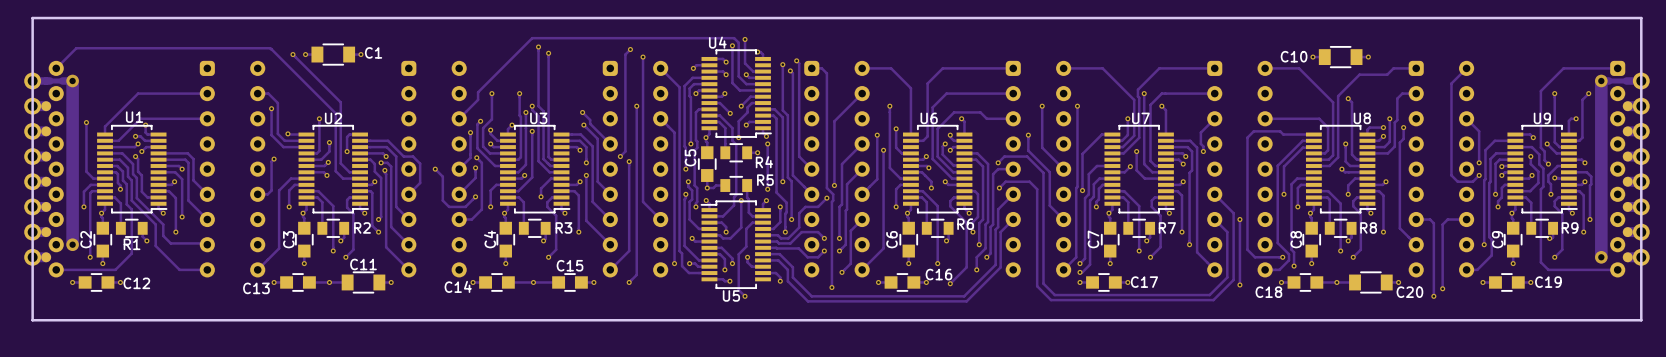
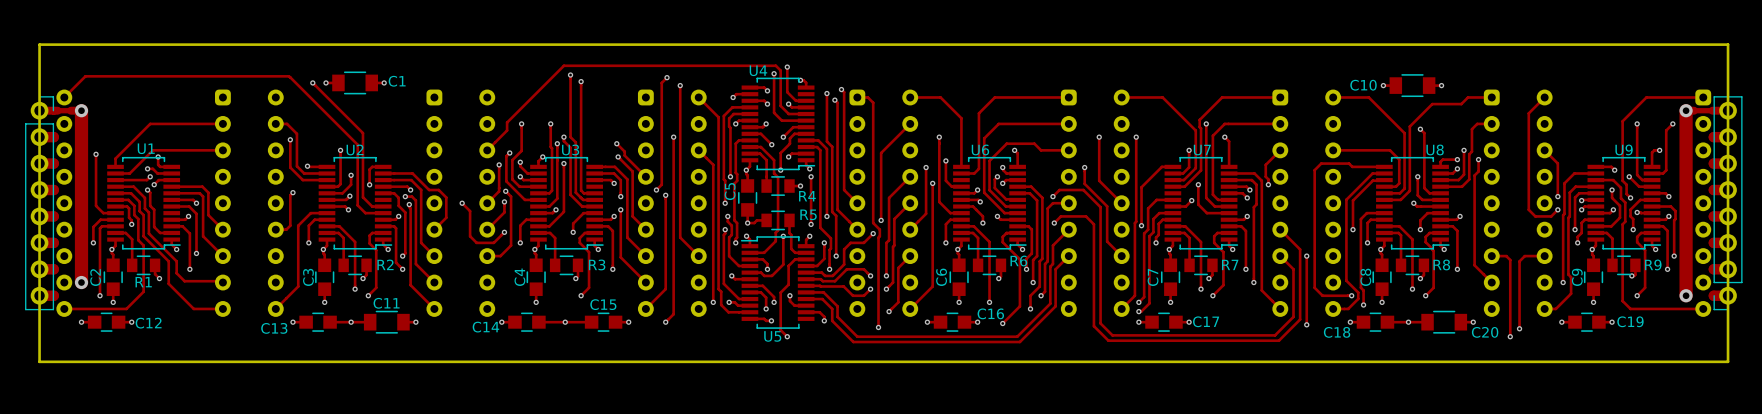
part footprint: [24, 72, 42, 266] -> [25, 96, 55, 311]
part footprint: [1632, 72, 1650, 266] -> [1713, 96, 1743, 311]

